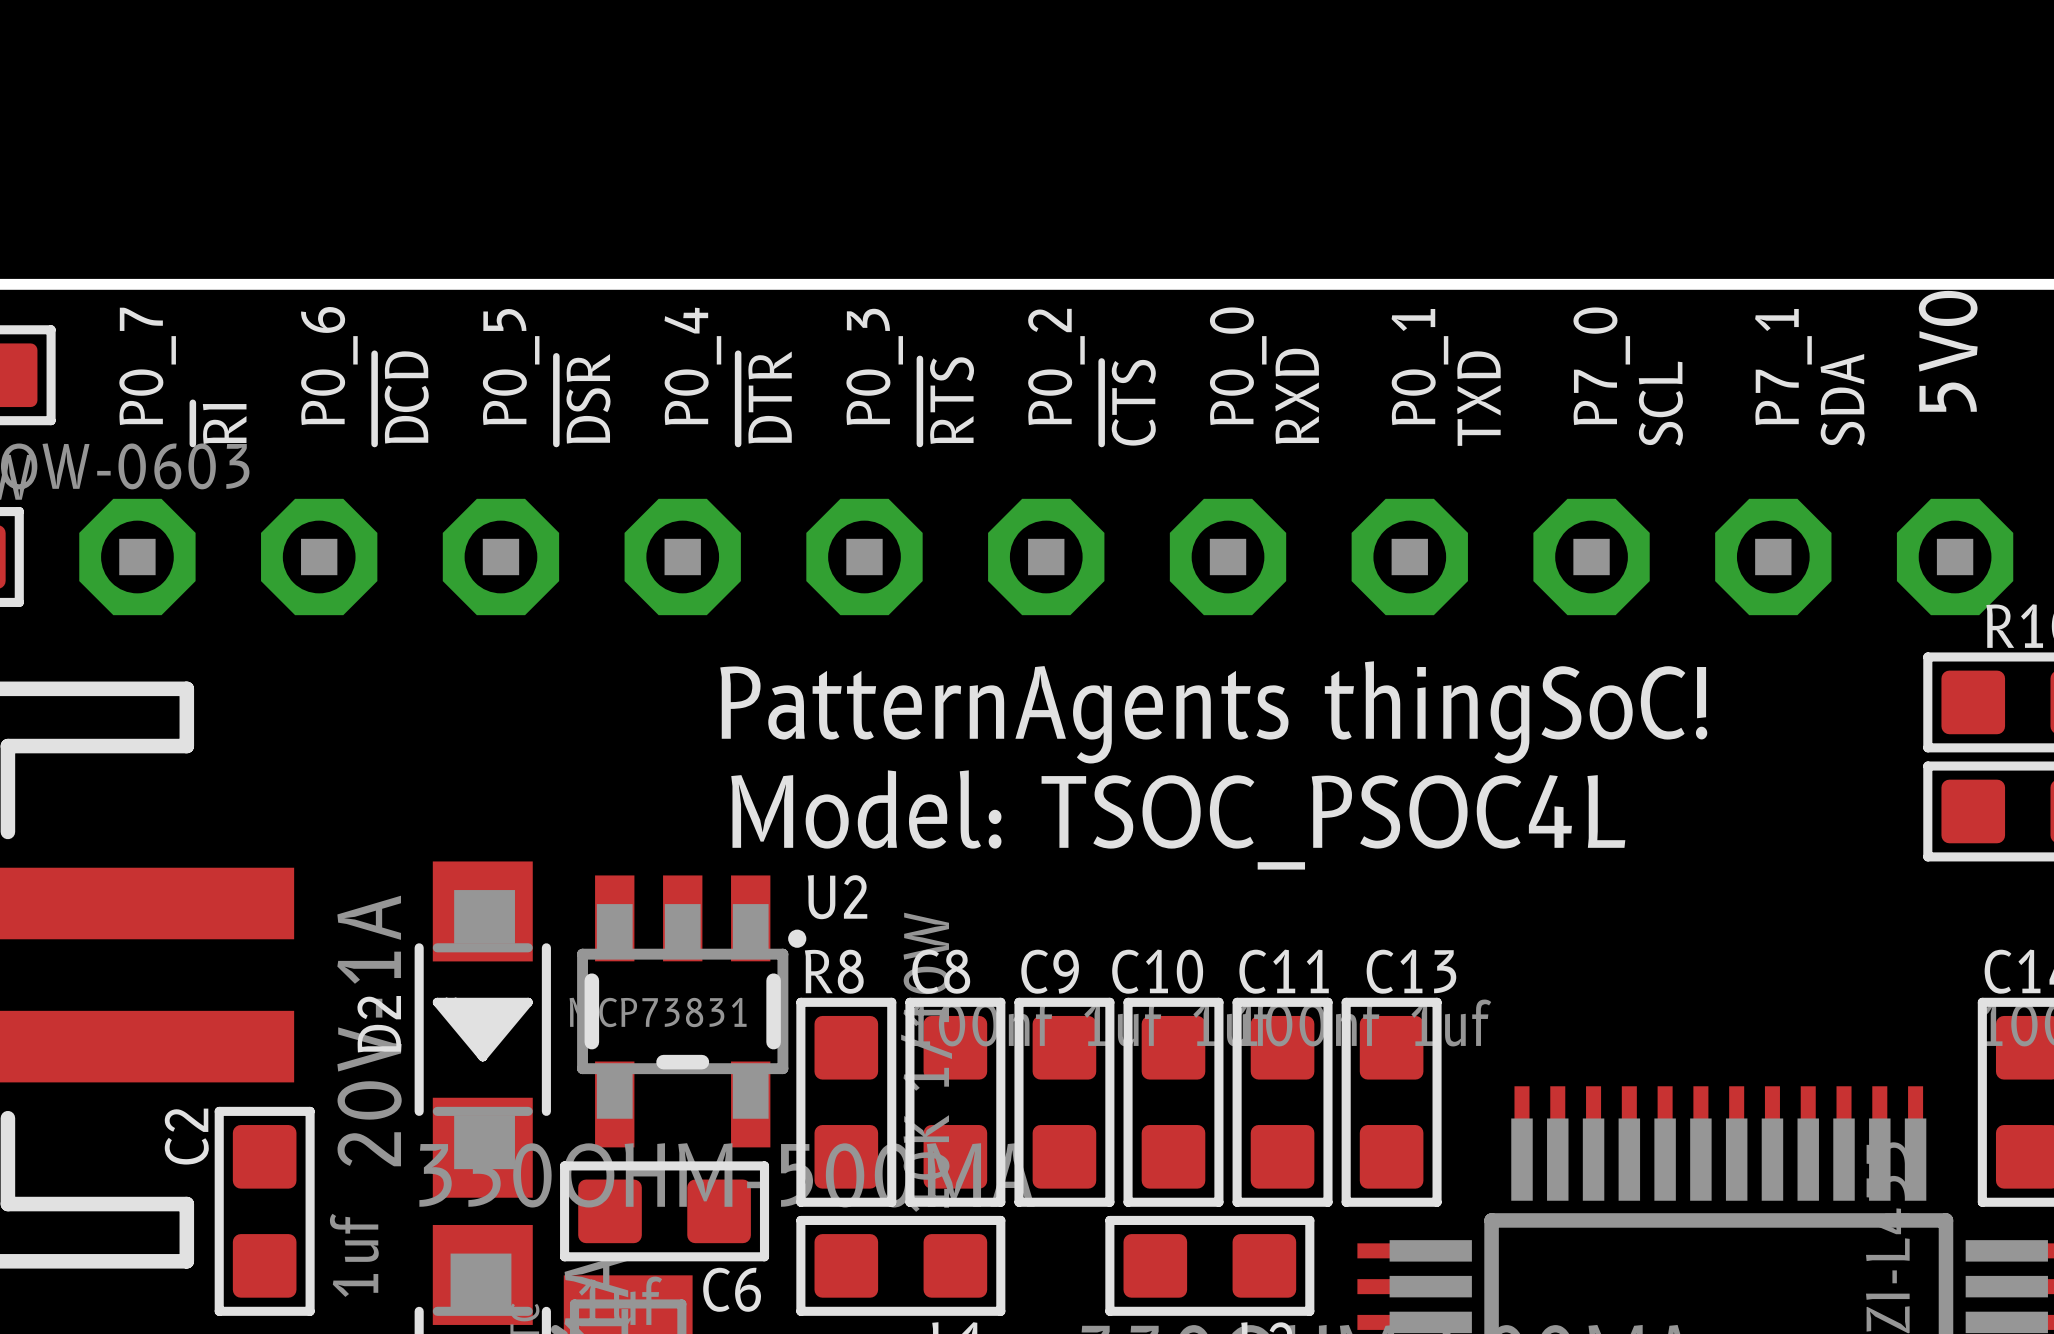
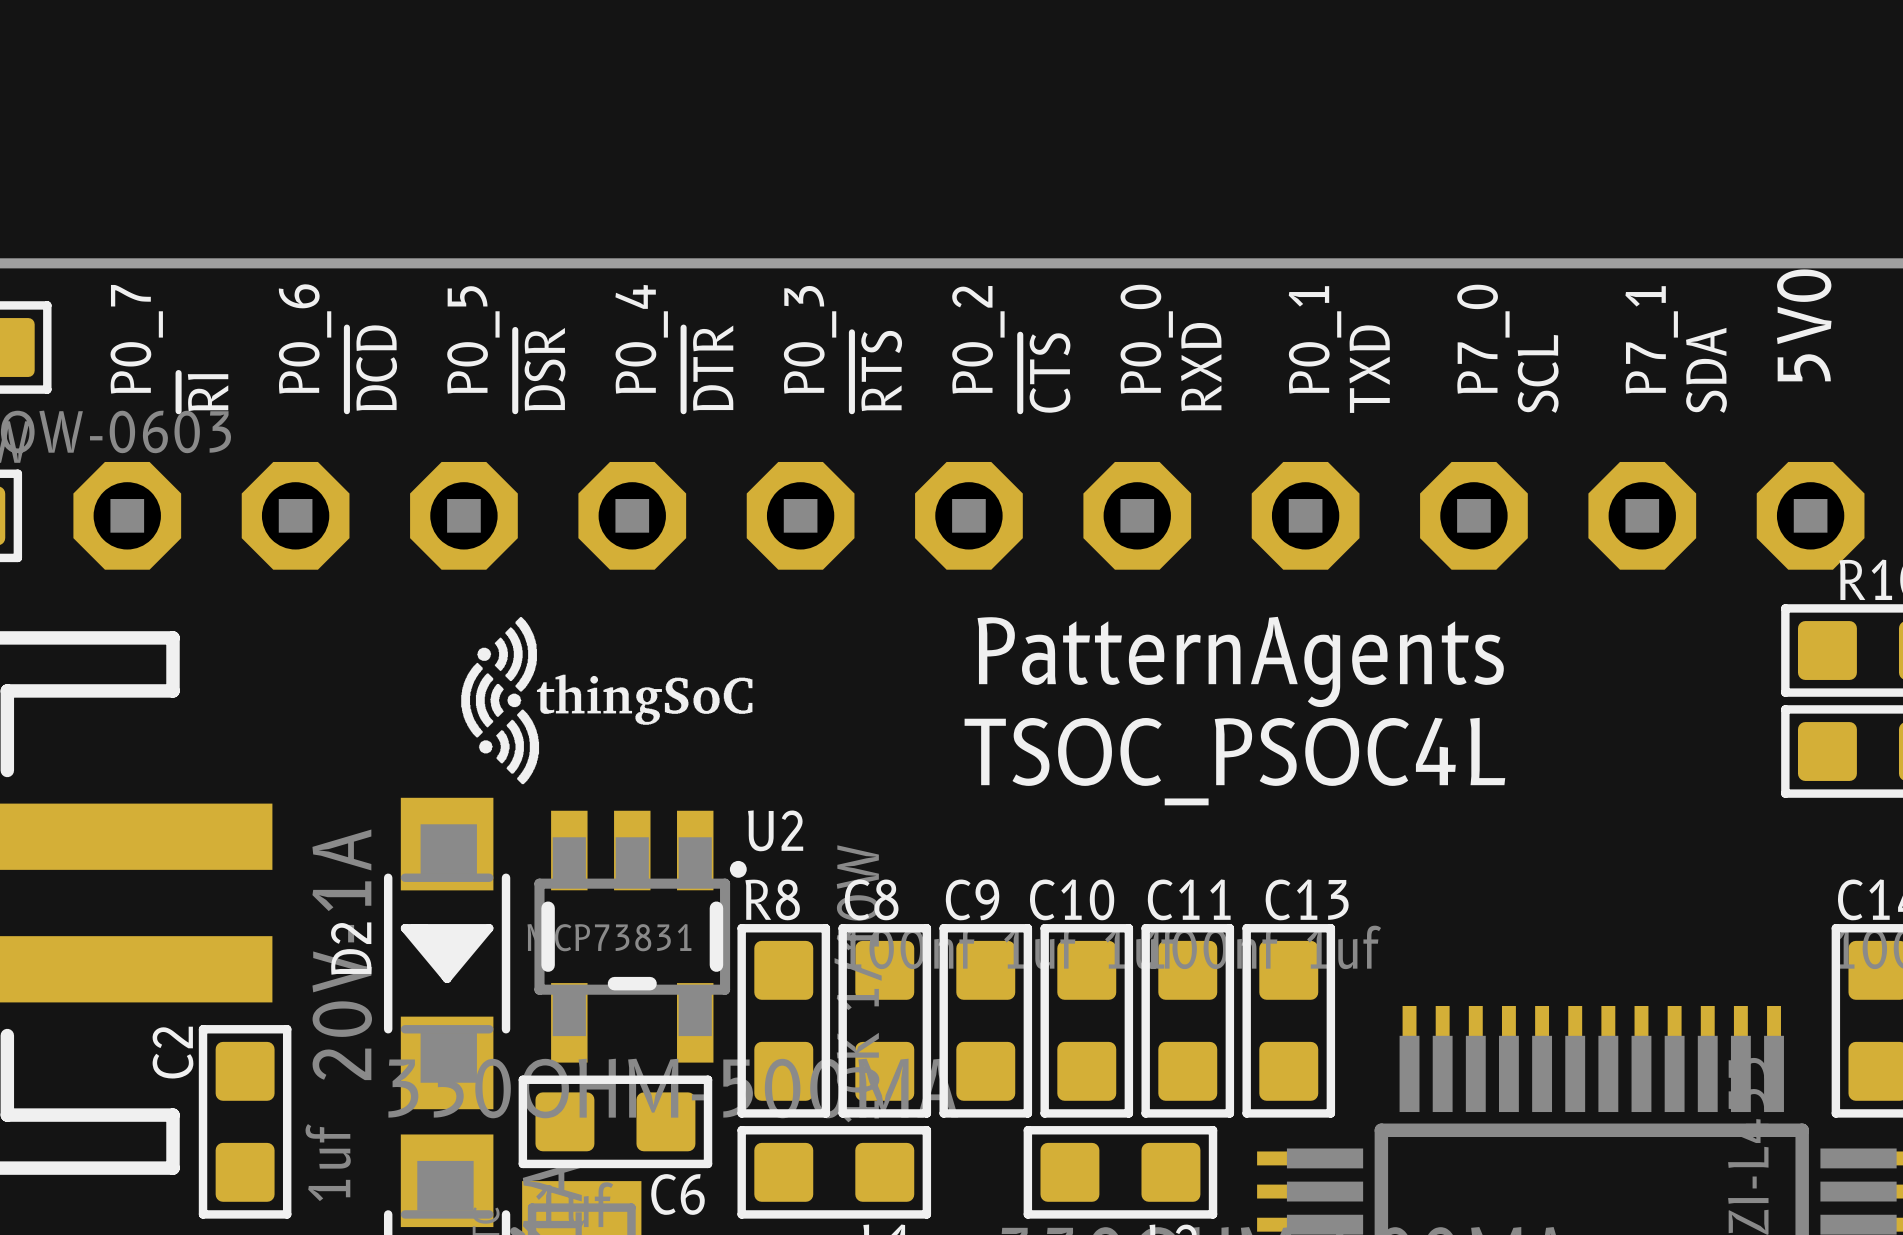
drawing: none -> [461, 617, 753, 785]
text: PatternAgents thingSoC! (1213, 712) -> PatternAgents (1240, 661)
text: Model: TSOC_PSOC4L (1178, 819) -> TSOC_PSOC4L (1234, 761)

